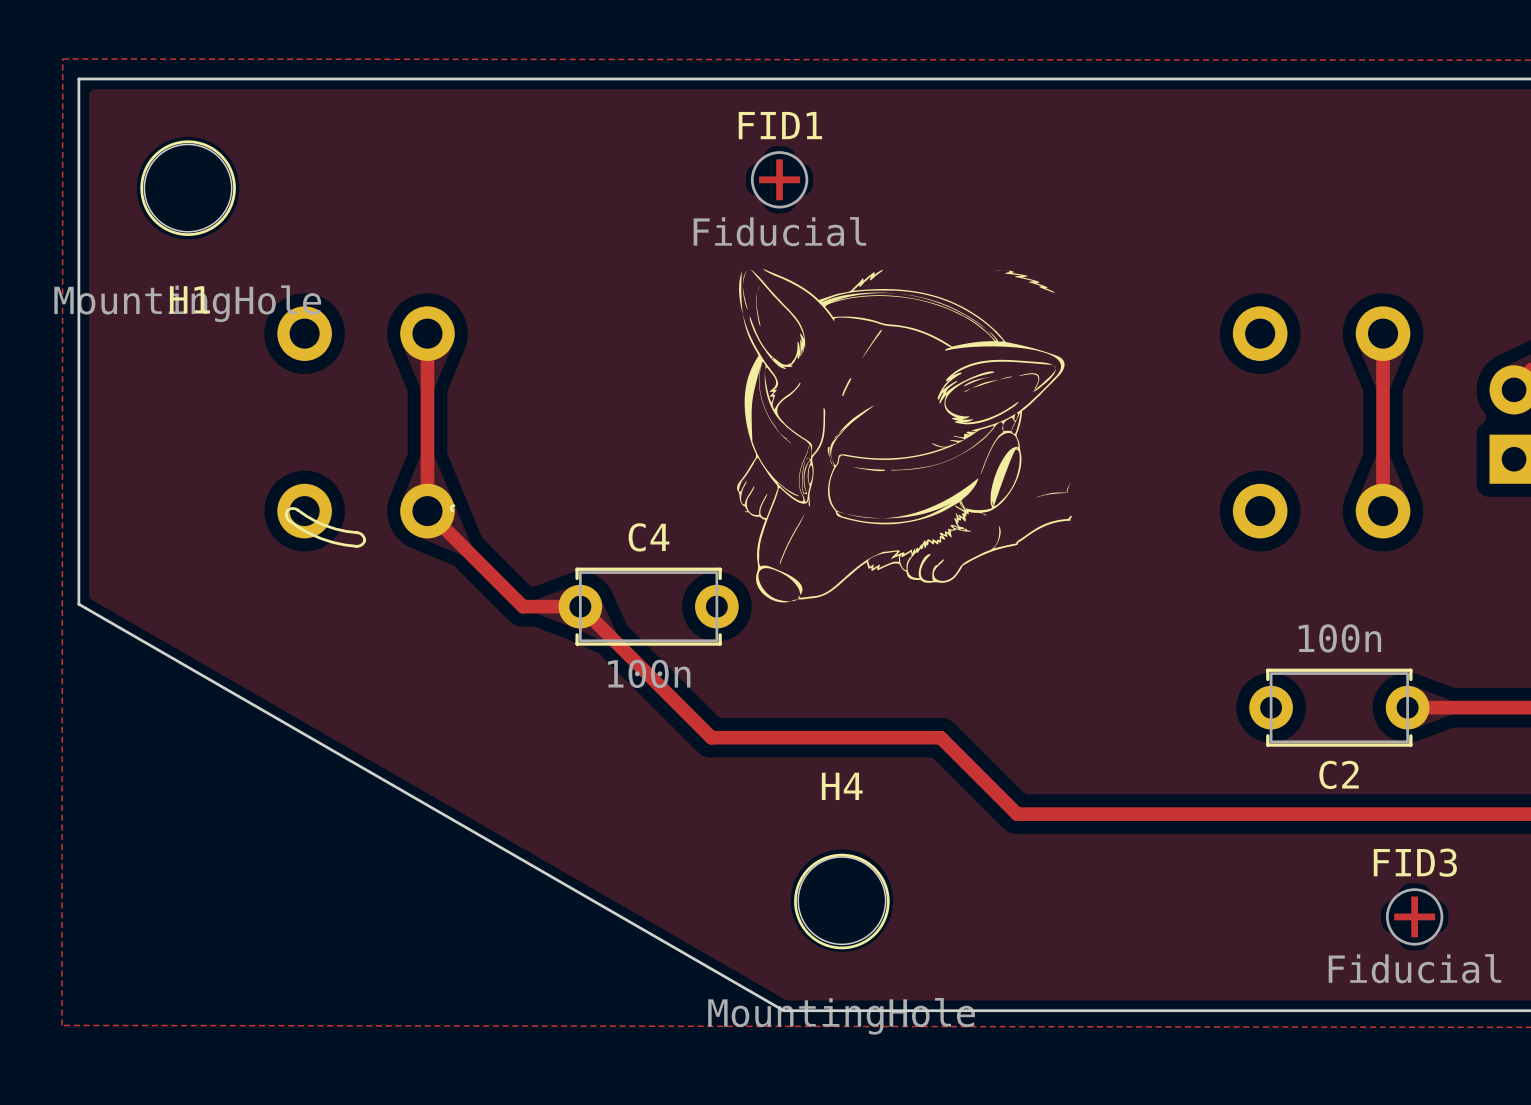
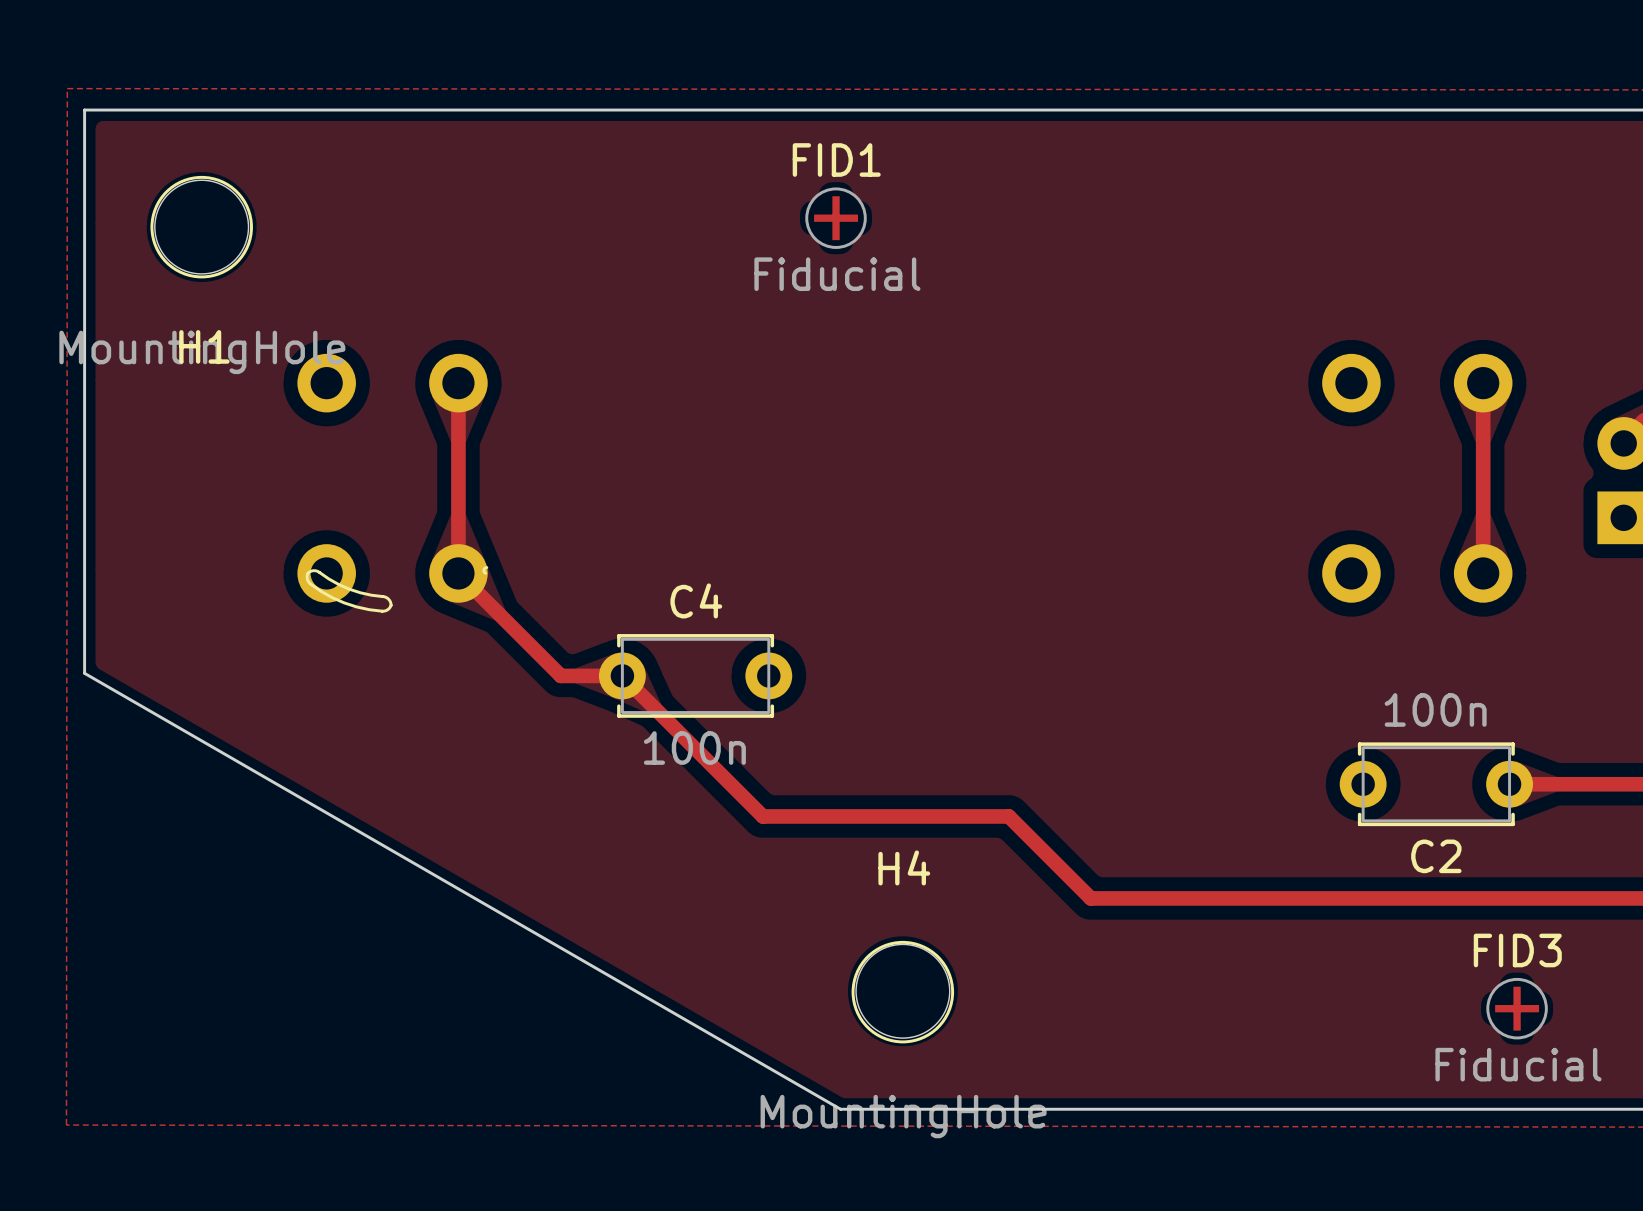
drawing: [737, 269, 1072, 603] -> none

